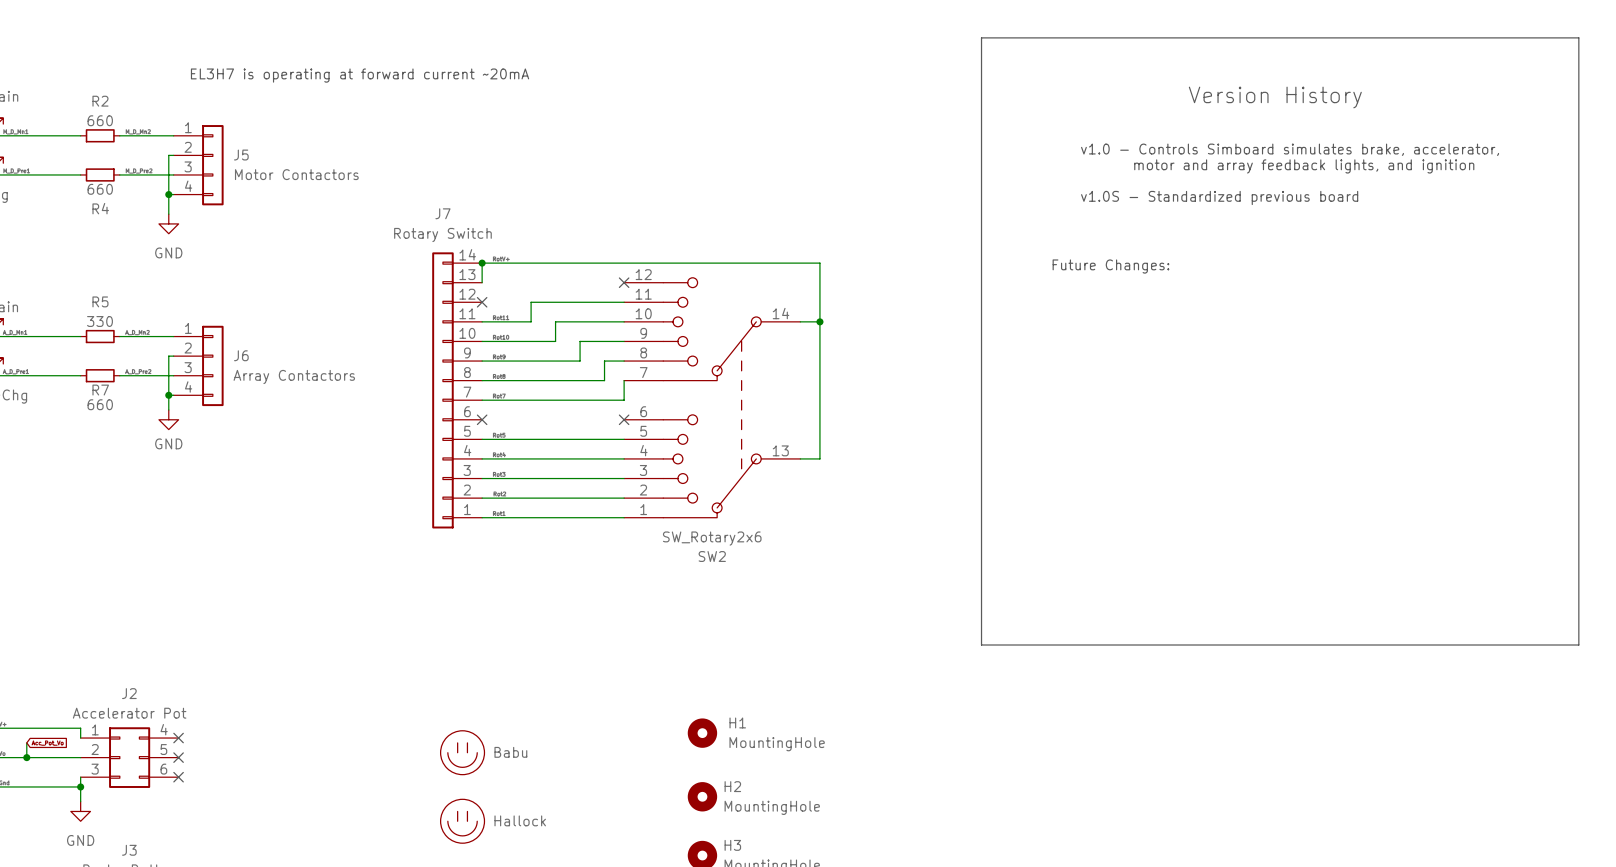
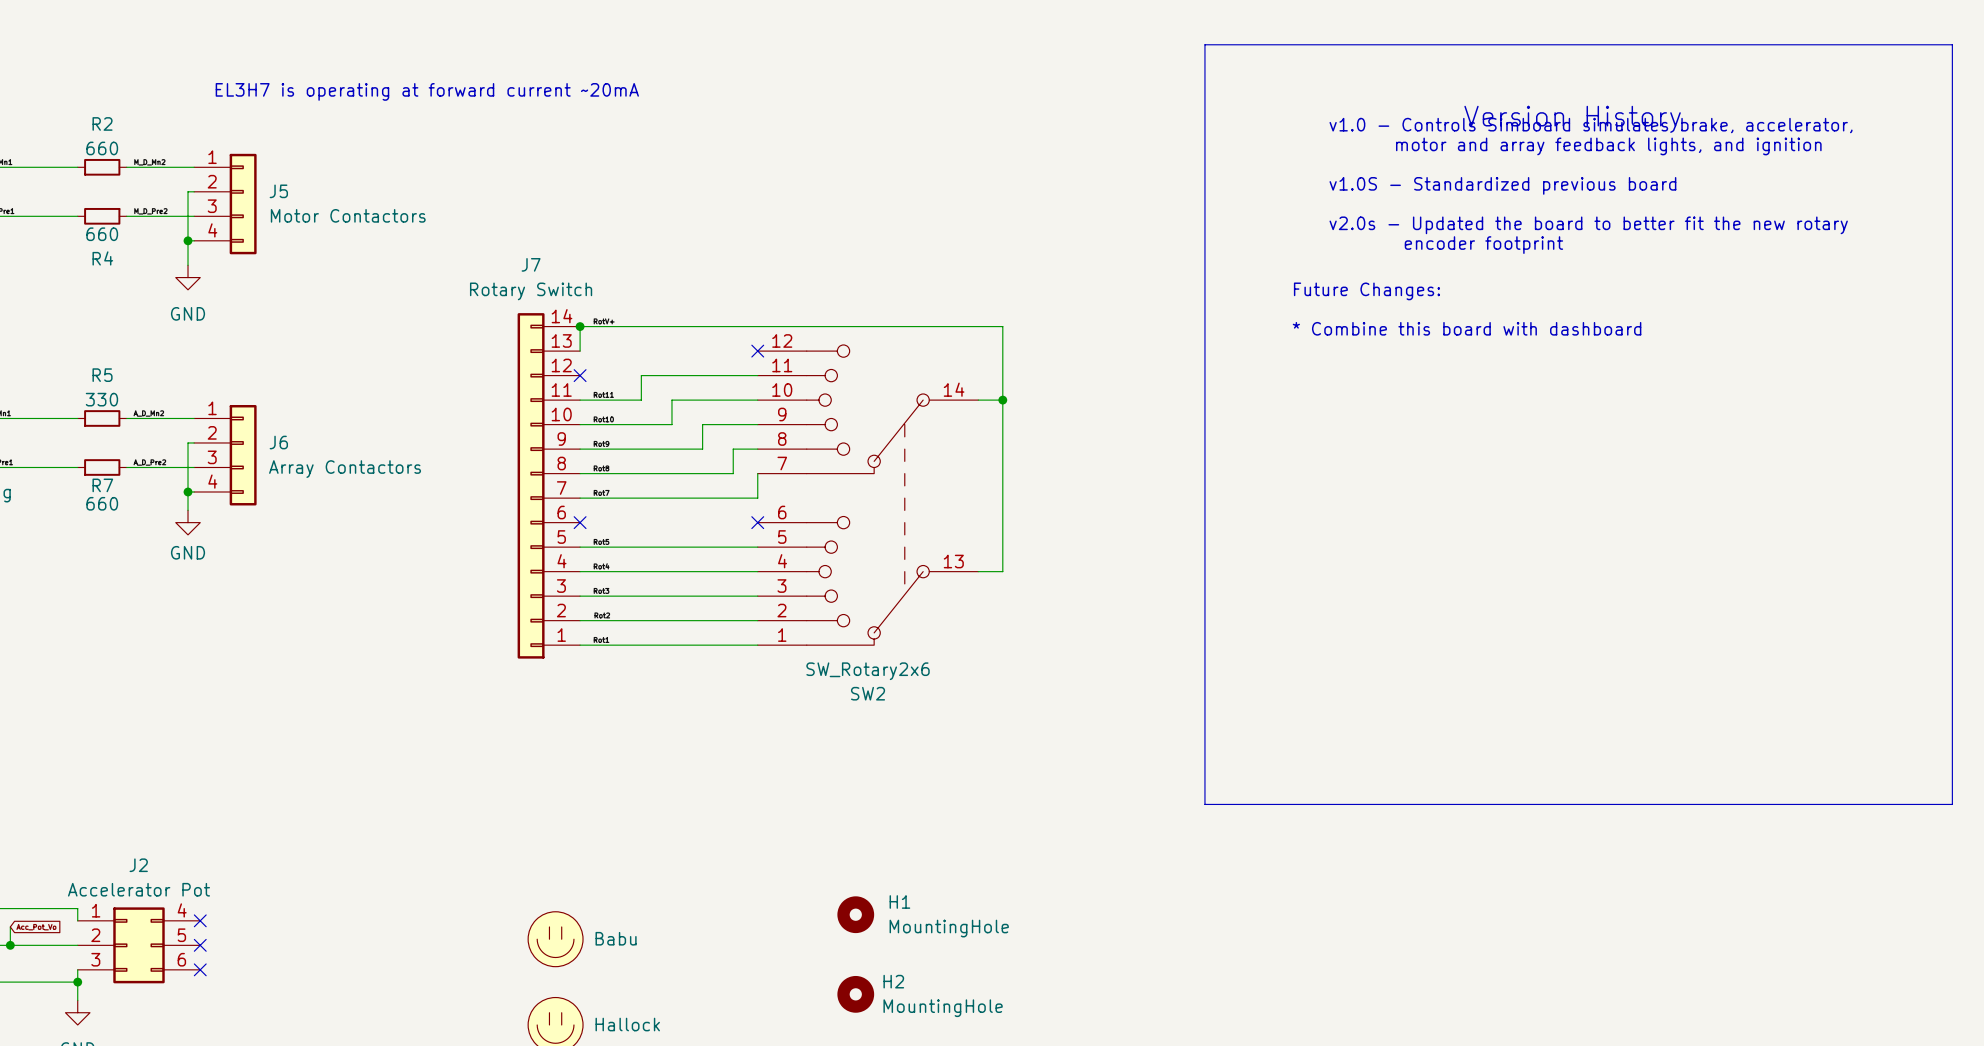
text: none -> v1.0 - Controls Simboard simulates brake, accelerator, (1591, 125)
text: v1.0 - Controls Simboard simulates brake, accelerator, (1290, 149) -> v1.0S - Standardized previous board (1502, 185)
text position: motor and array feedback lights, and ignition (1304, 166) -> motor and array feedback lights, and ignition (1608, 146)
text: none -> v2.0s - Updated the board to better fit the new rotary (1588, 225)
text: v1.0S - Standardized previous board (1219, 197) -> encoder footprint (1483, 245)
text: none -> Future Changes: (1366, 291)
text: Future Changes: (1110, 266) -> * Combine this board with dashboard (1467, 328)

